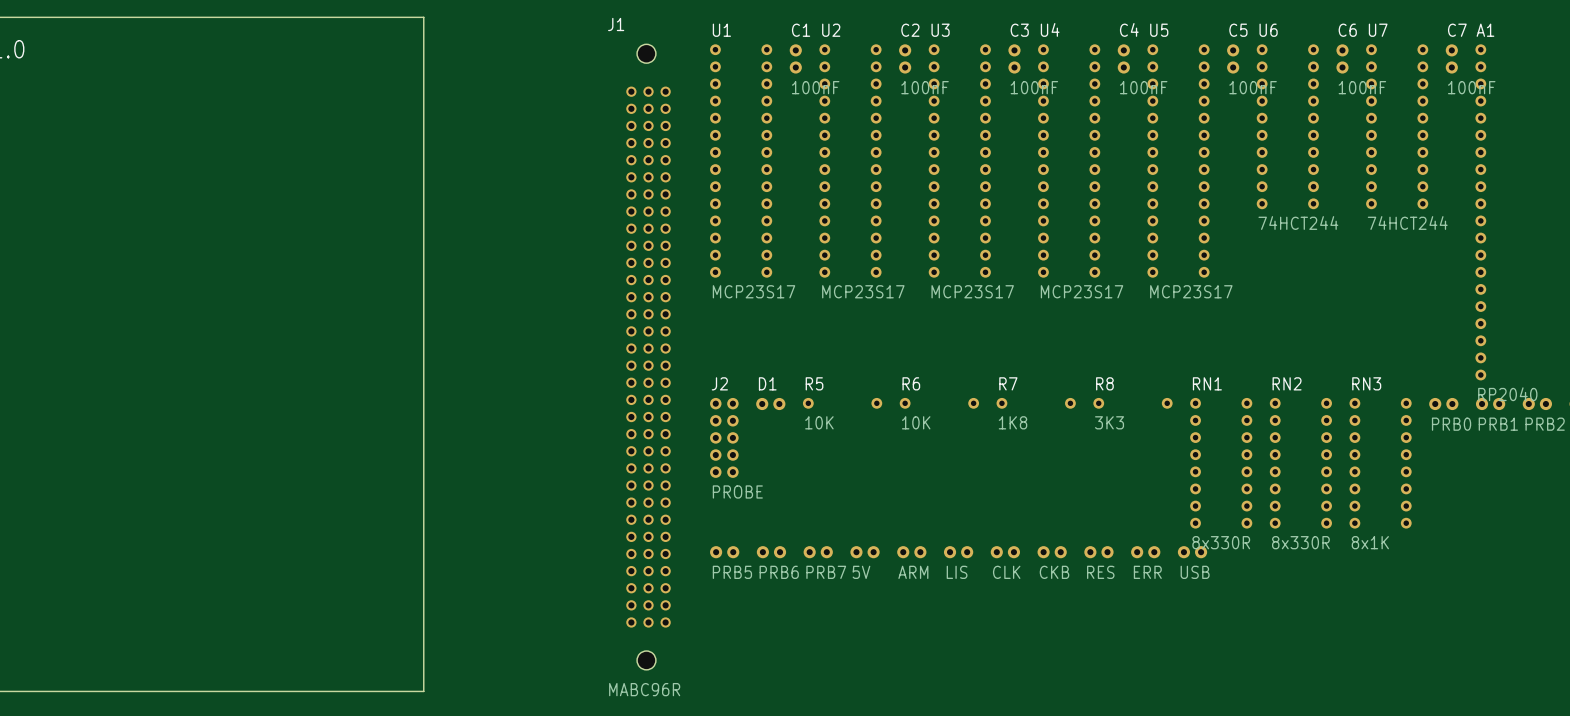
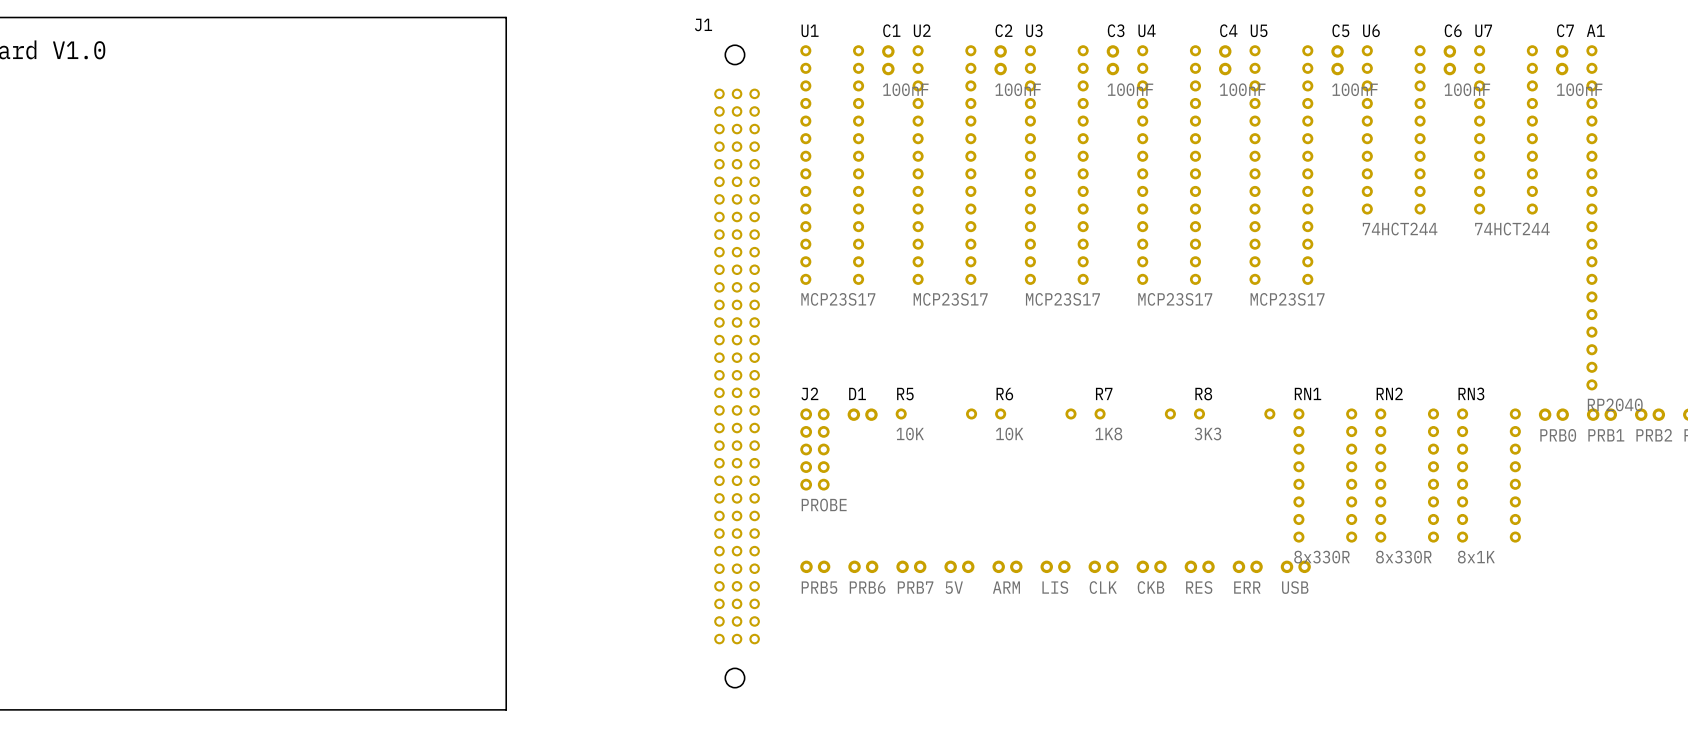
J1 value: MABC96R (644, 689) -> none

